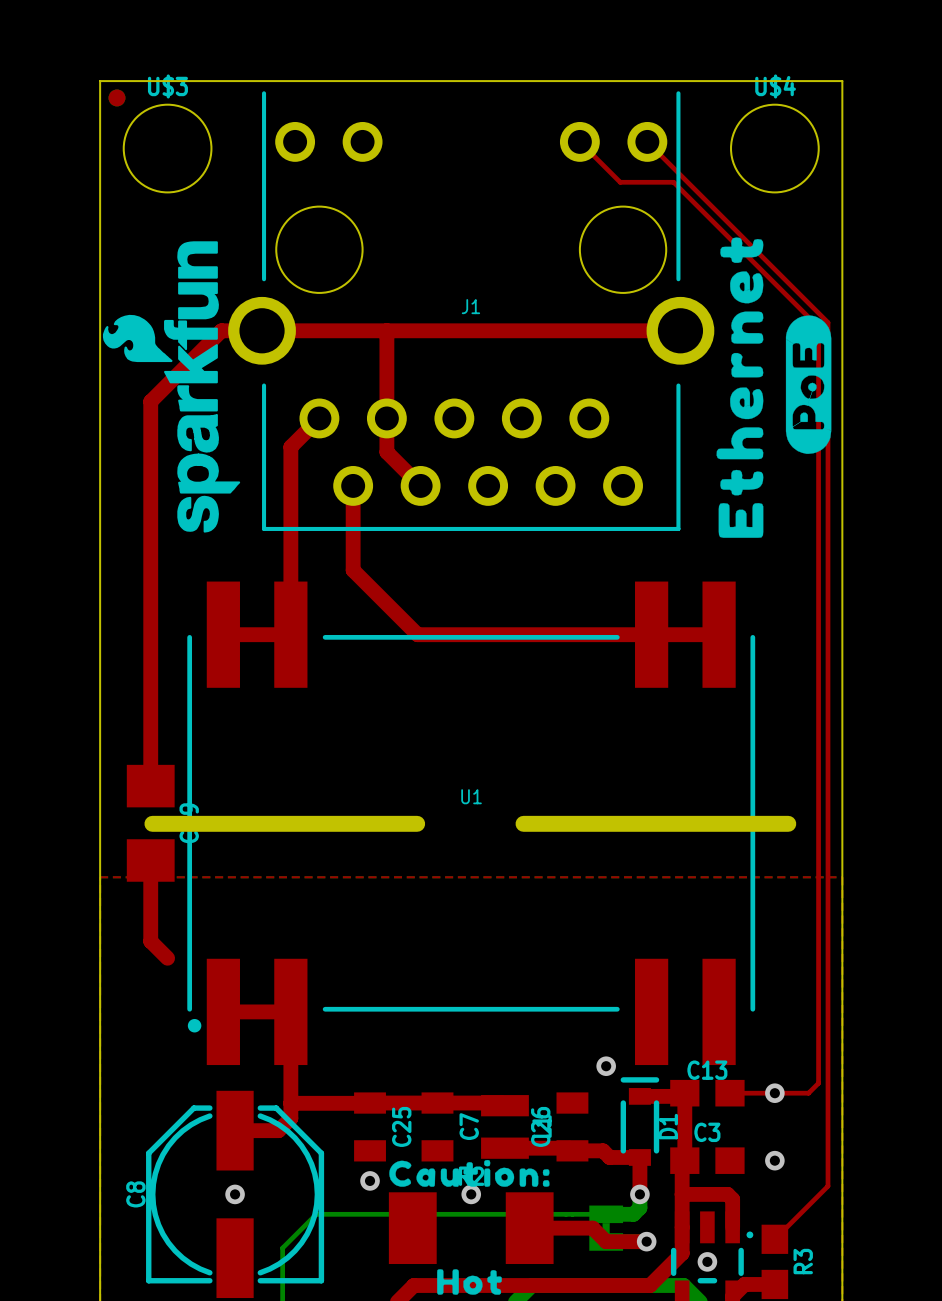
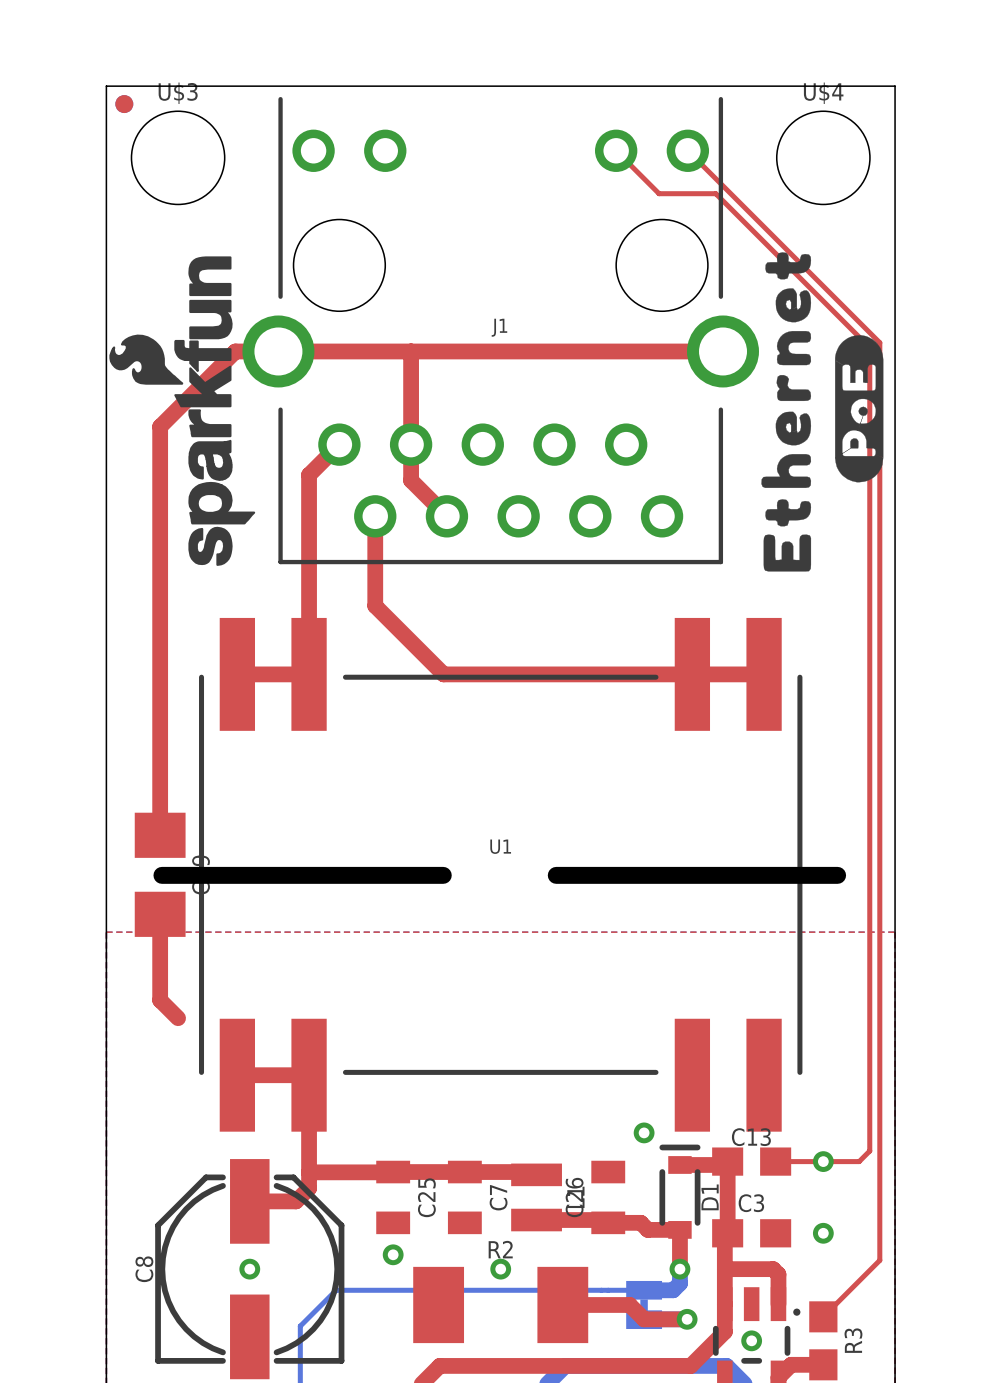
U1 footprint: [187, 581, 756, 1066] -> [199, 617, 803, 1132]
drawing: [389, 1159, 550, 1187] -> none
drawing: [437, 1269, 502, 1295] -> none

